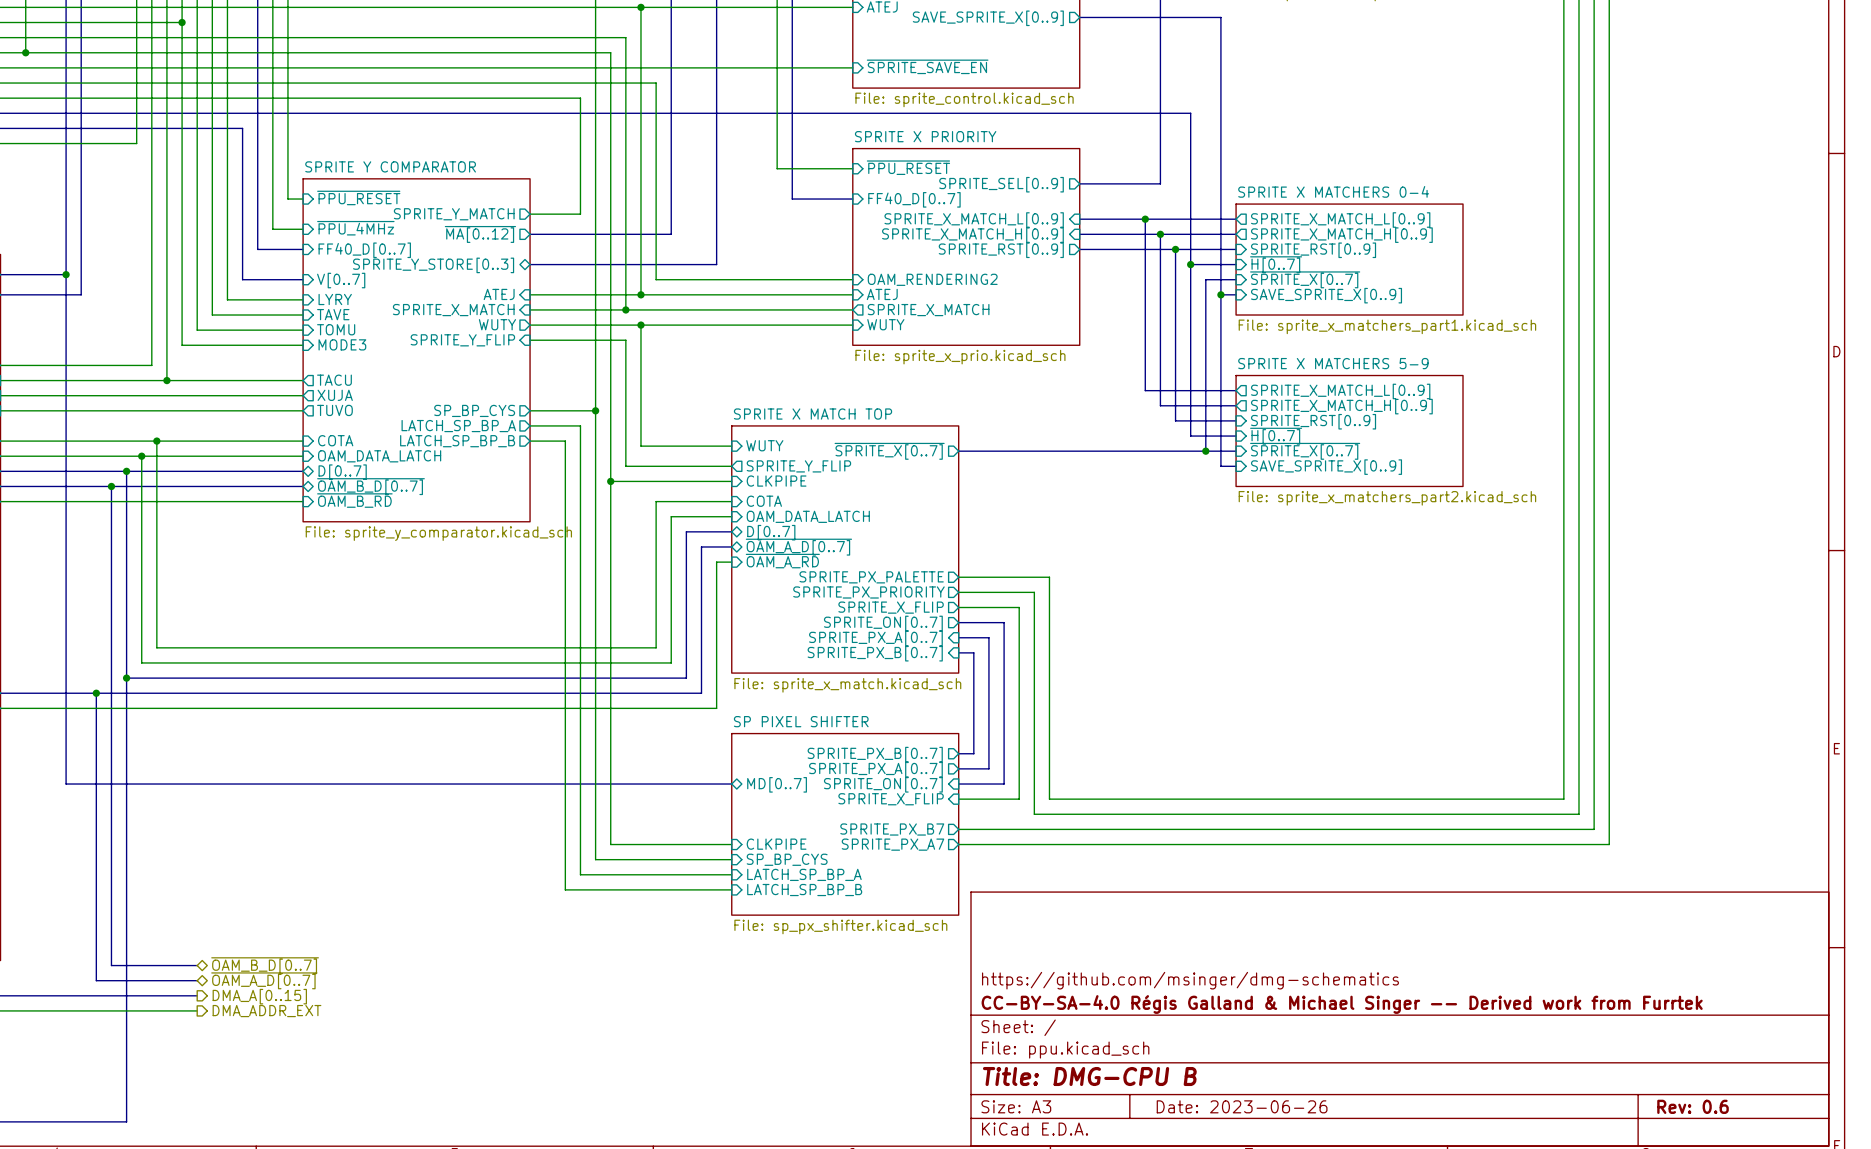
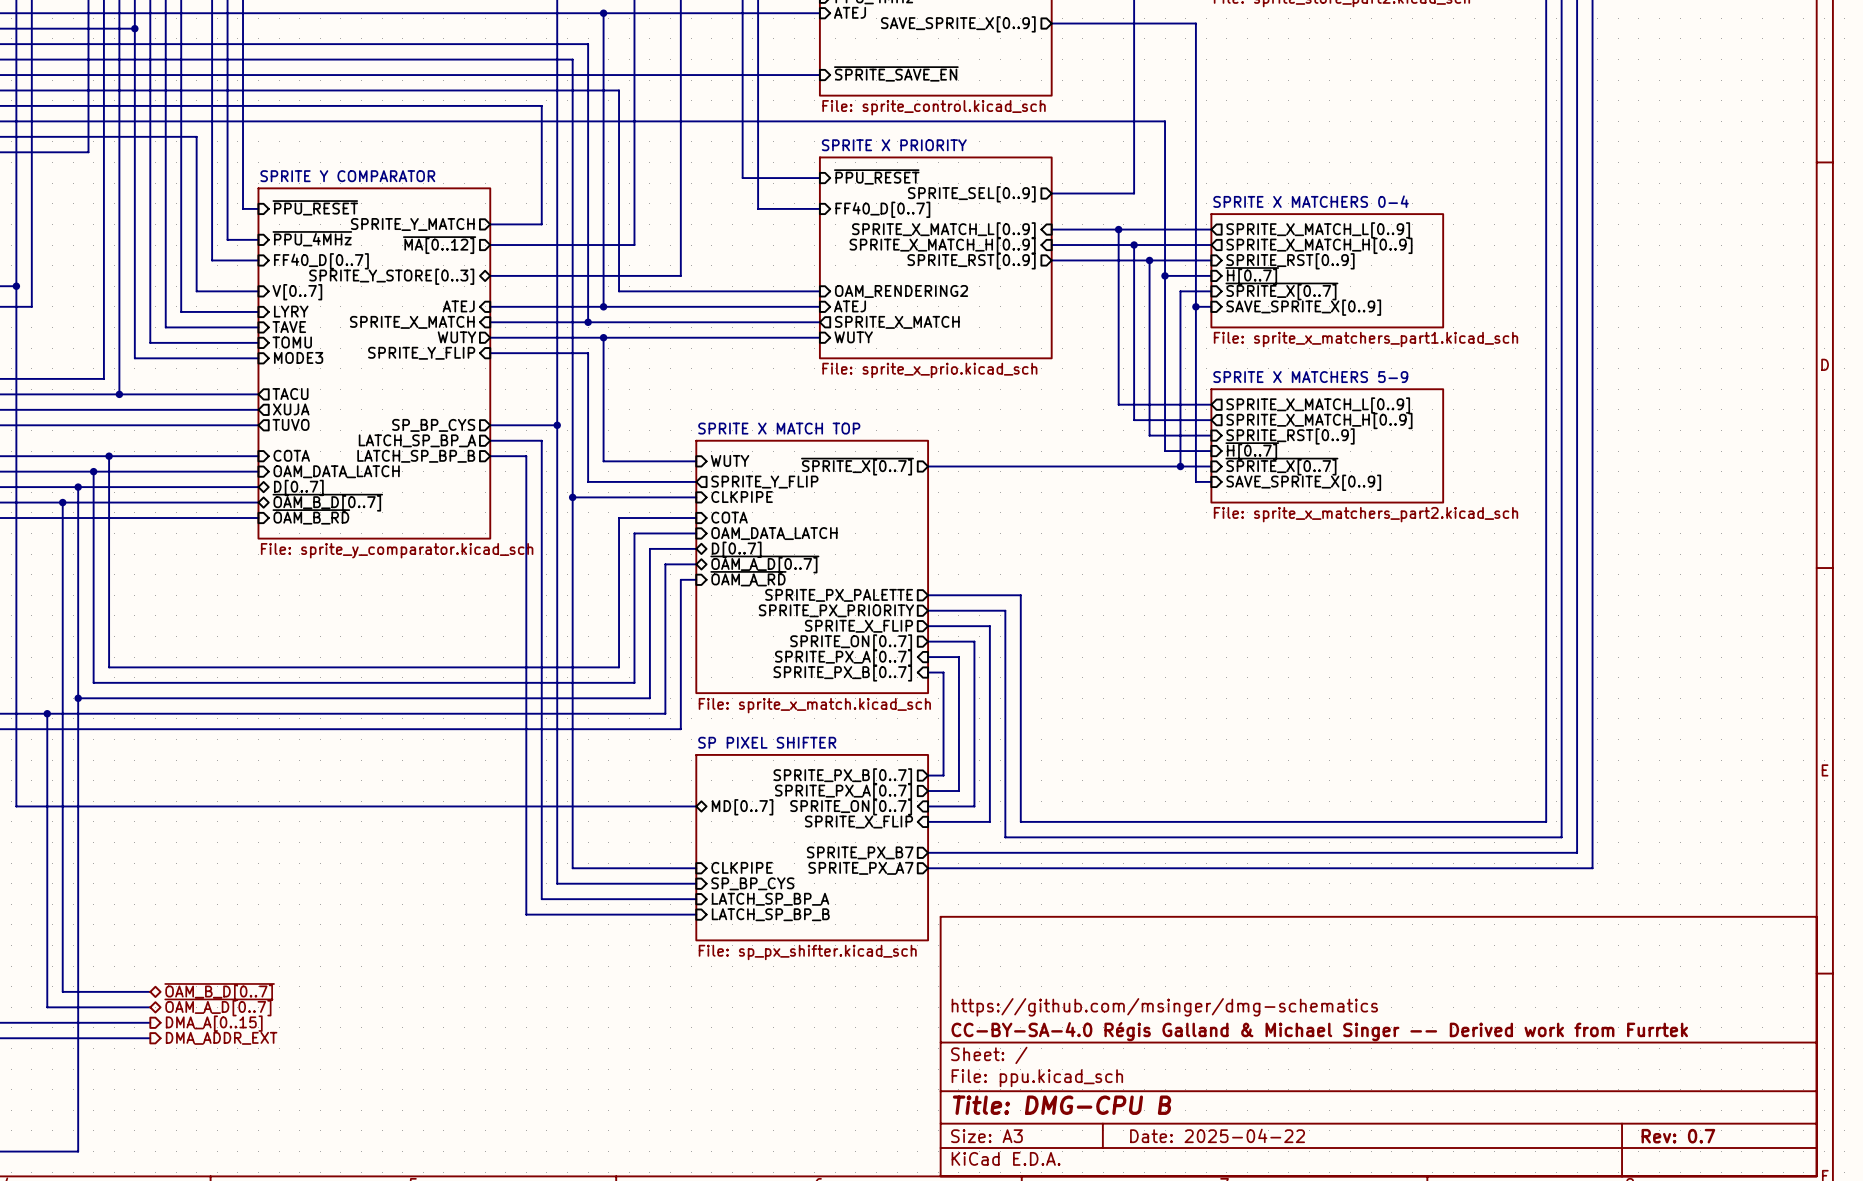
title block: Date: 2023-06-26 (1242, 1106) -> Date: 2025-04-22 (1217, 1135)
title block: Rev: 0.6 (1693, 1106) -> Rev: 0.7 (1678, 1136)

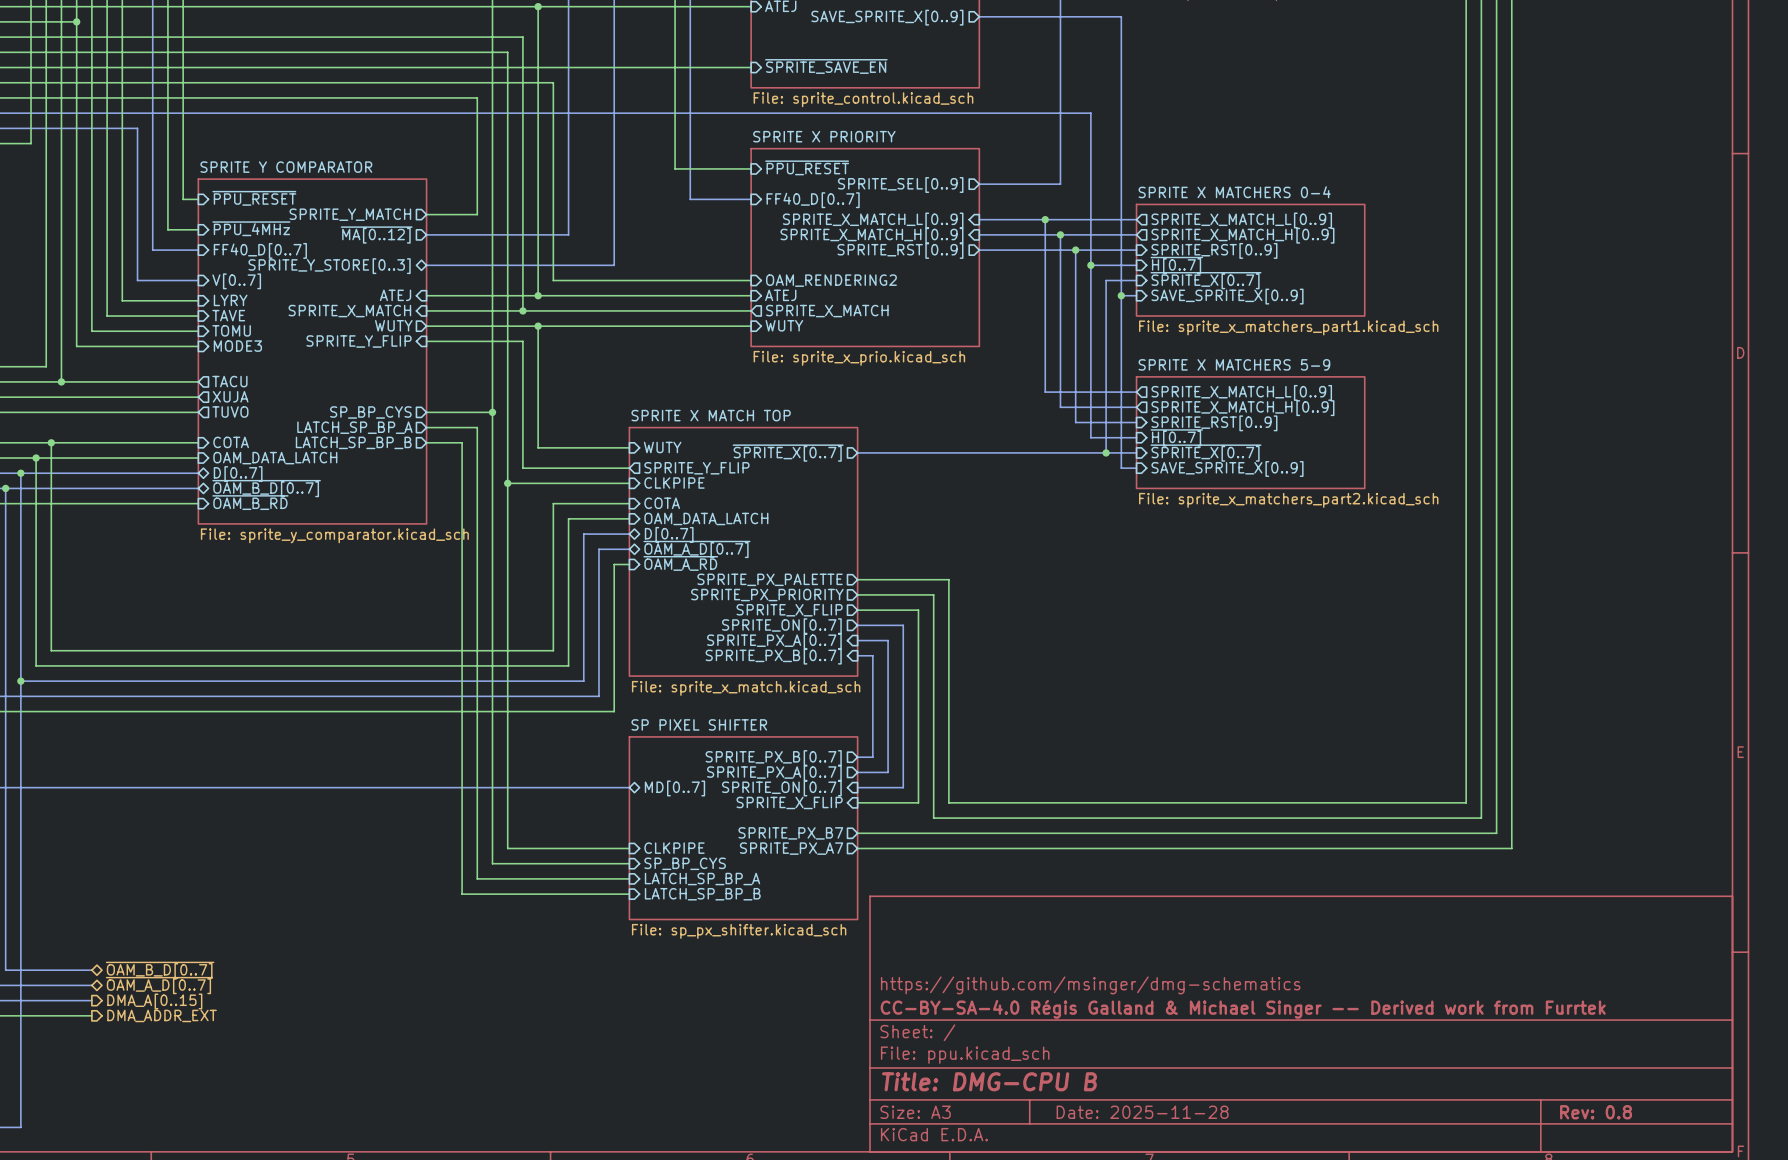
title block: Date: 2025-04-22 (1217, 1135) -> Date: 2025-11-28 (1142, 1112)
title block: Rev: 0.7 (1678, 1136) -> Rev: 0.8 (1596, 1112)

